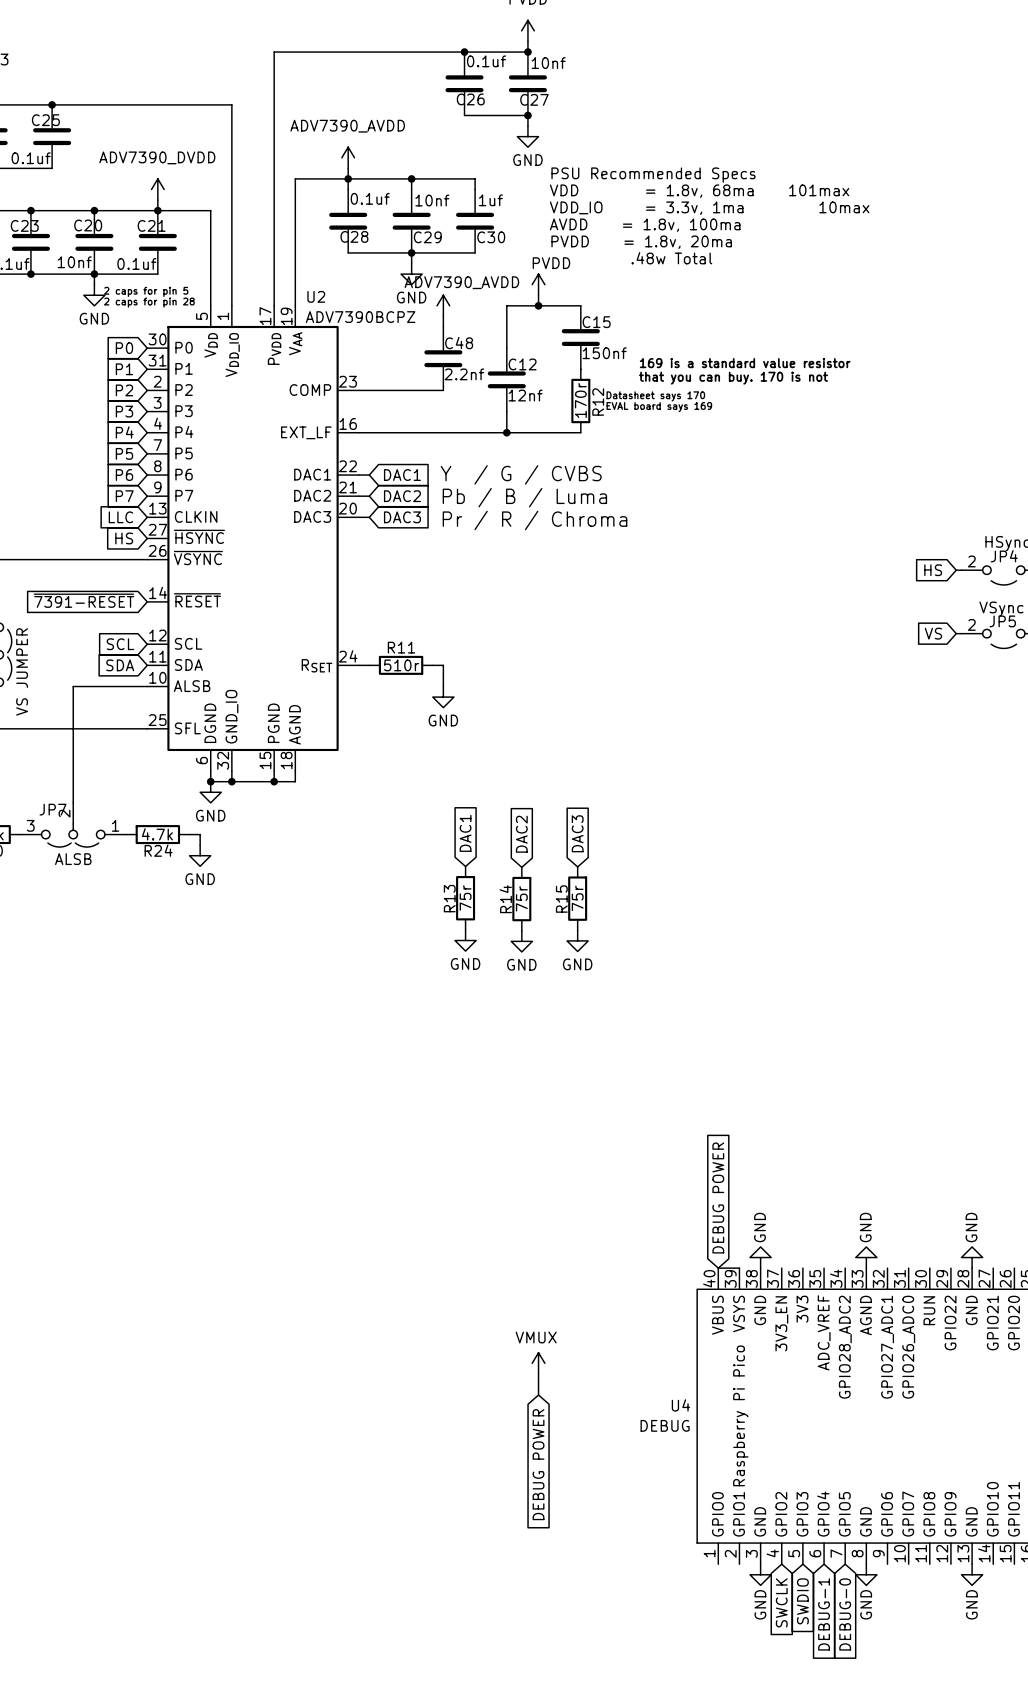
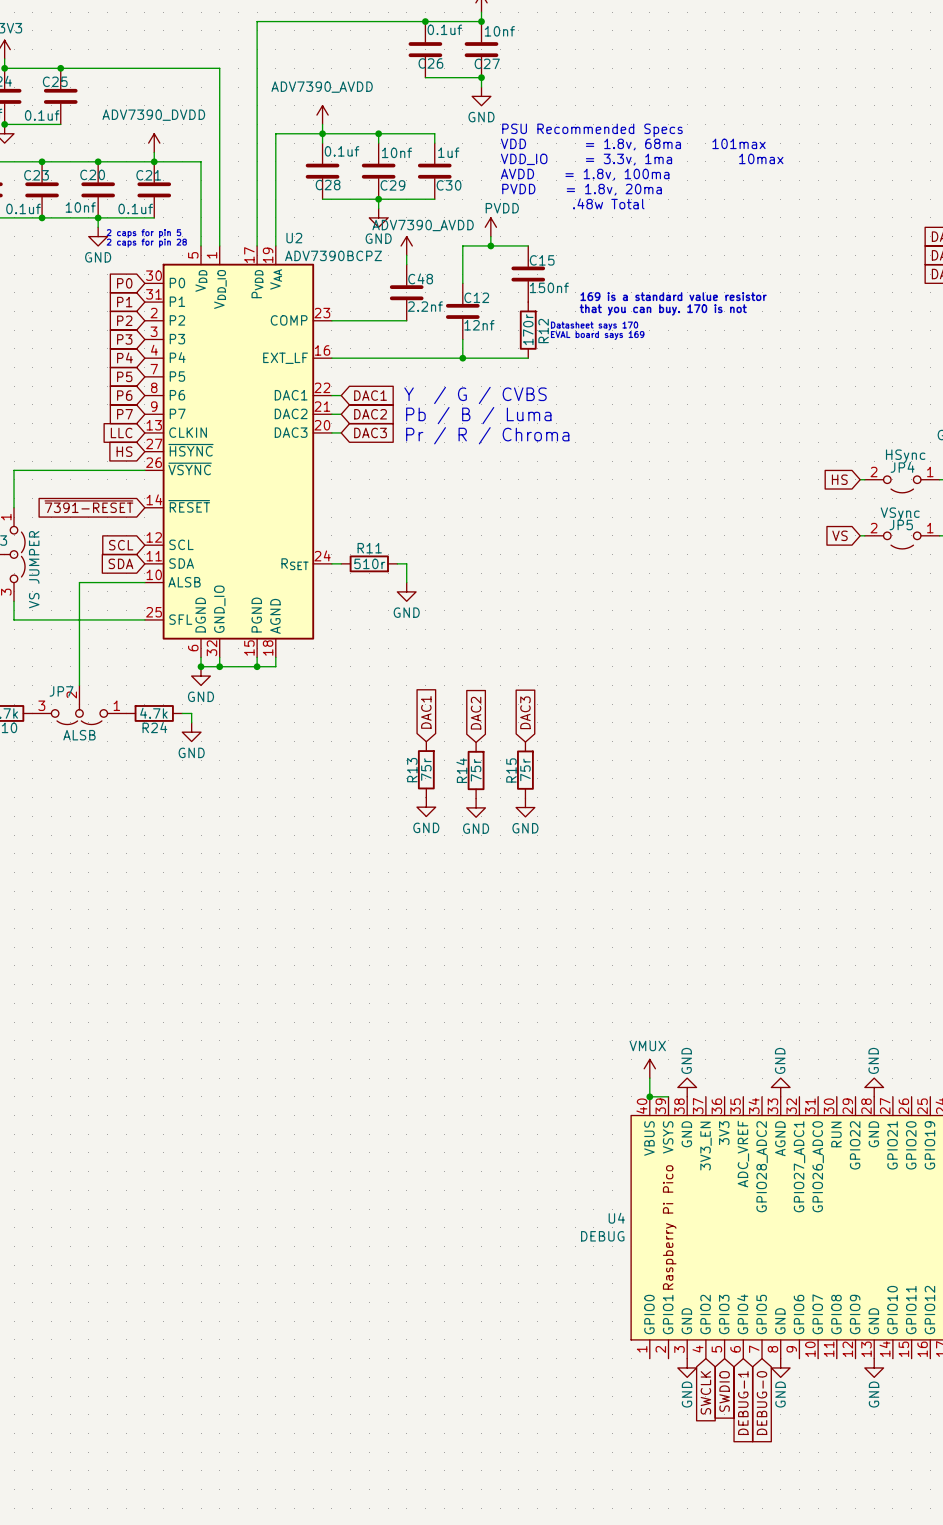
global label: DEBUG POWER (718, 1197) -> none
power symbol: none -> VMUX (649, 1068)
wire: none -> (649, 1078) (649, 1096)
junction: none -> (649, 1096)
power symbol: VMUX (538, 1363) -> none
wire: (538, 1373) (538, 1395) -> none
global label: DEBUG POWER (538, 1464) -> none

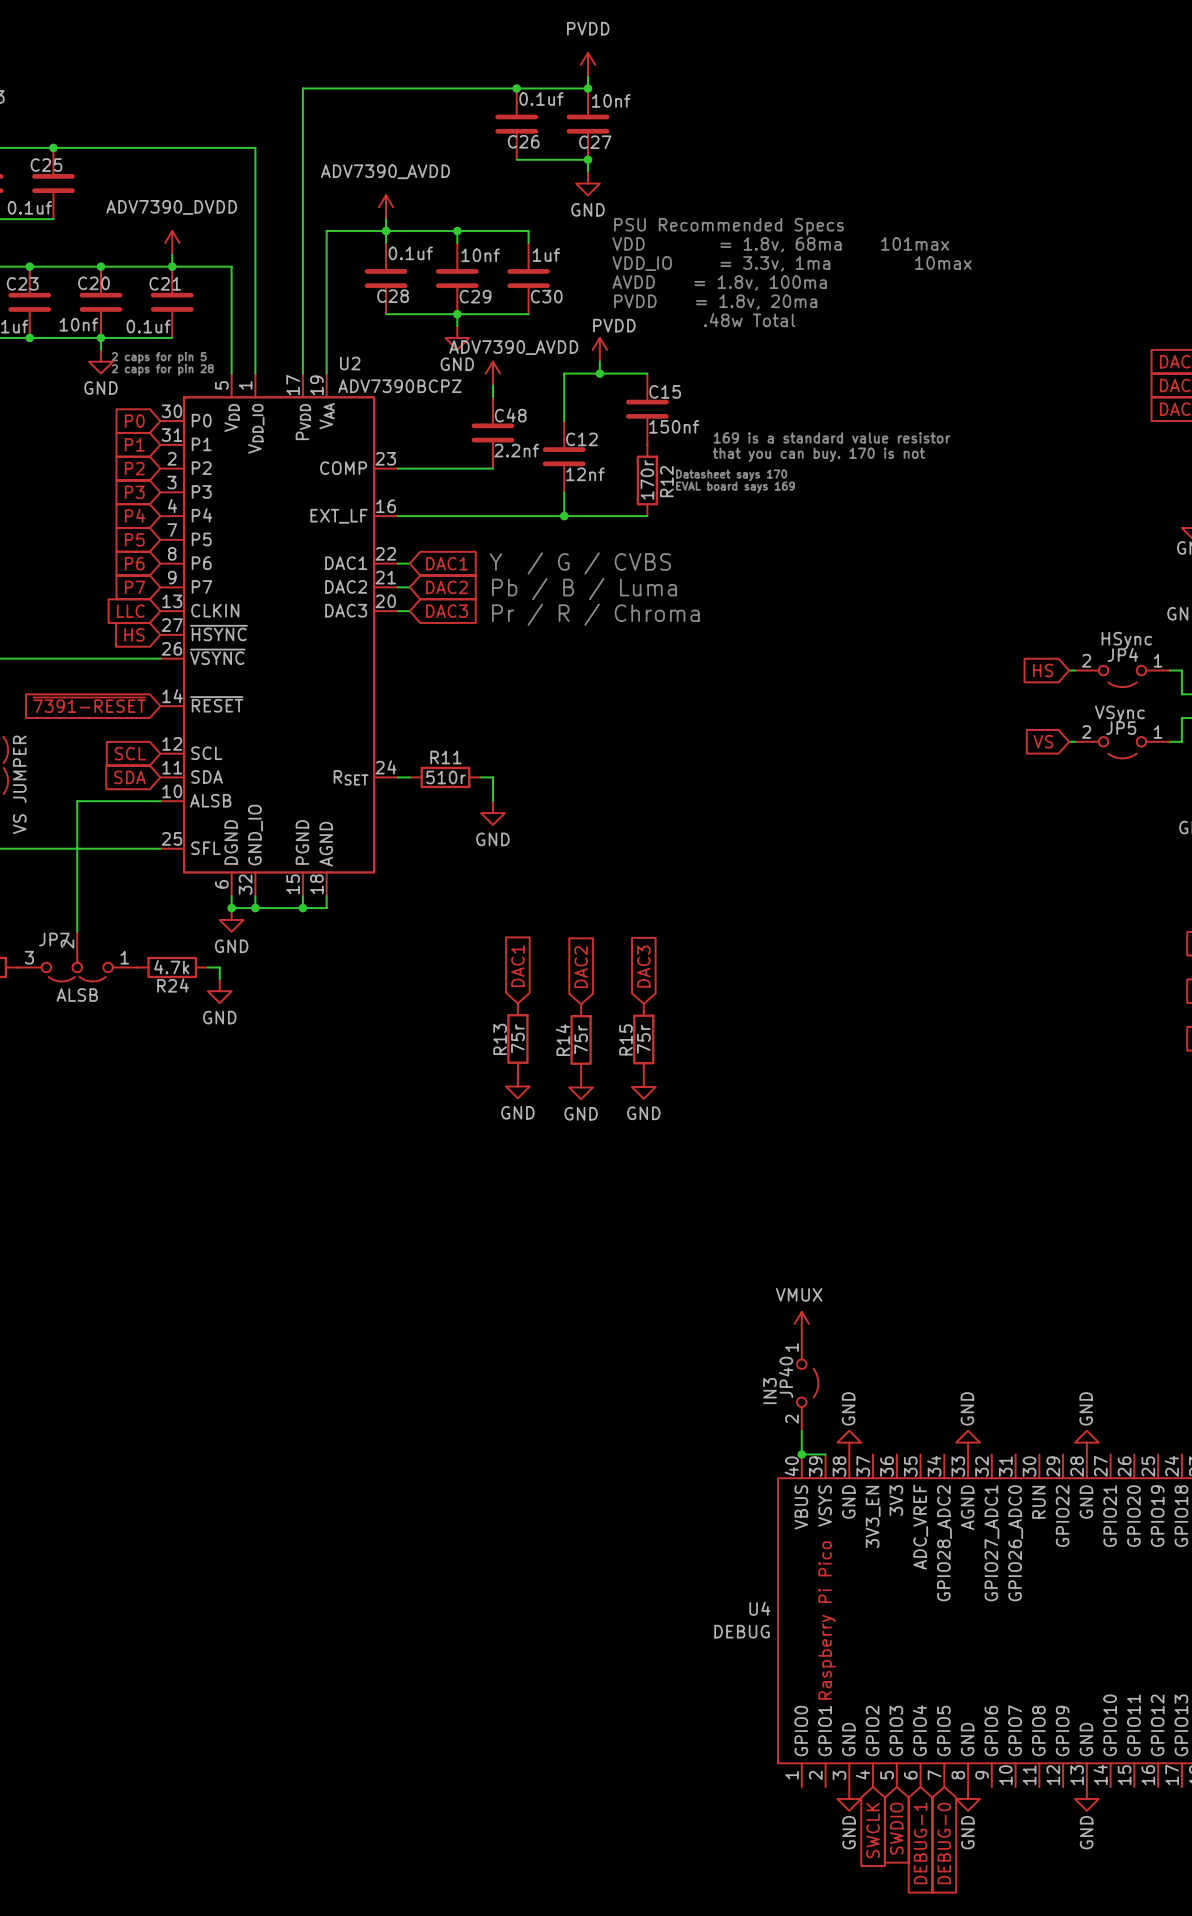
JP40: none -> IN3 (807, 1383)
power symbol position: VMUX (649, 1068) -> VMUX (801, 1323)

